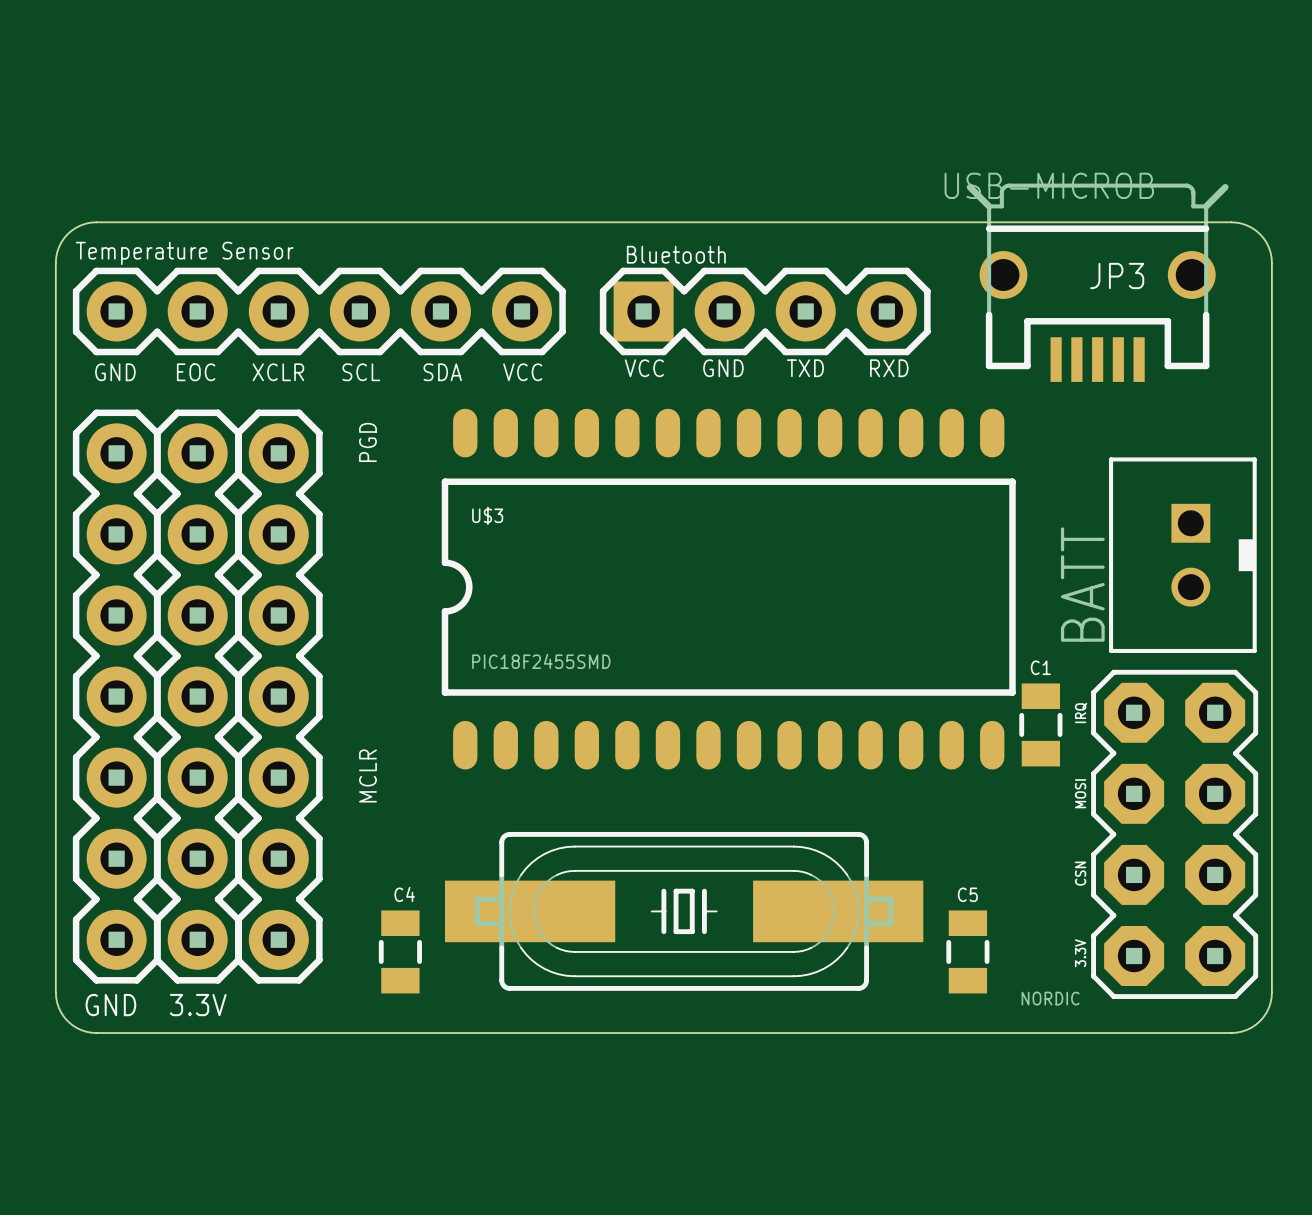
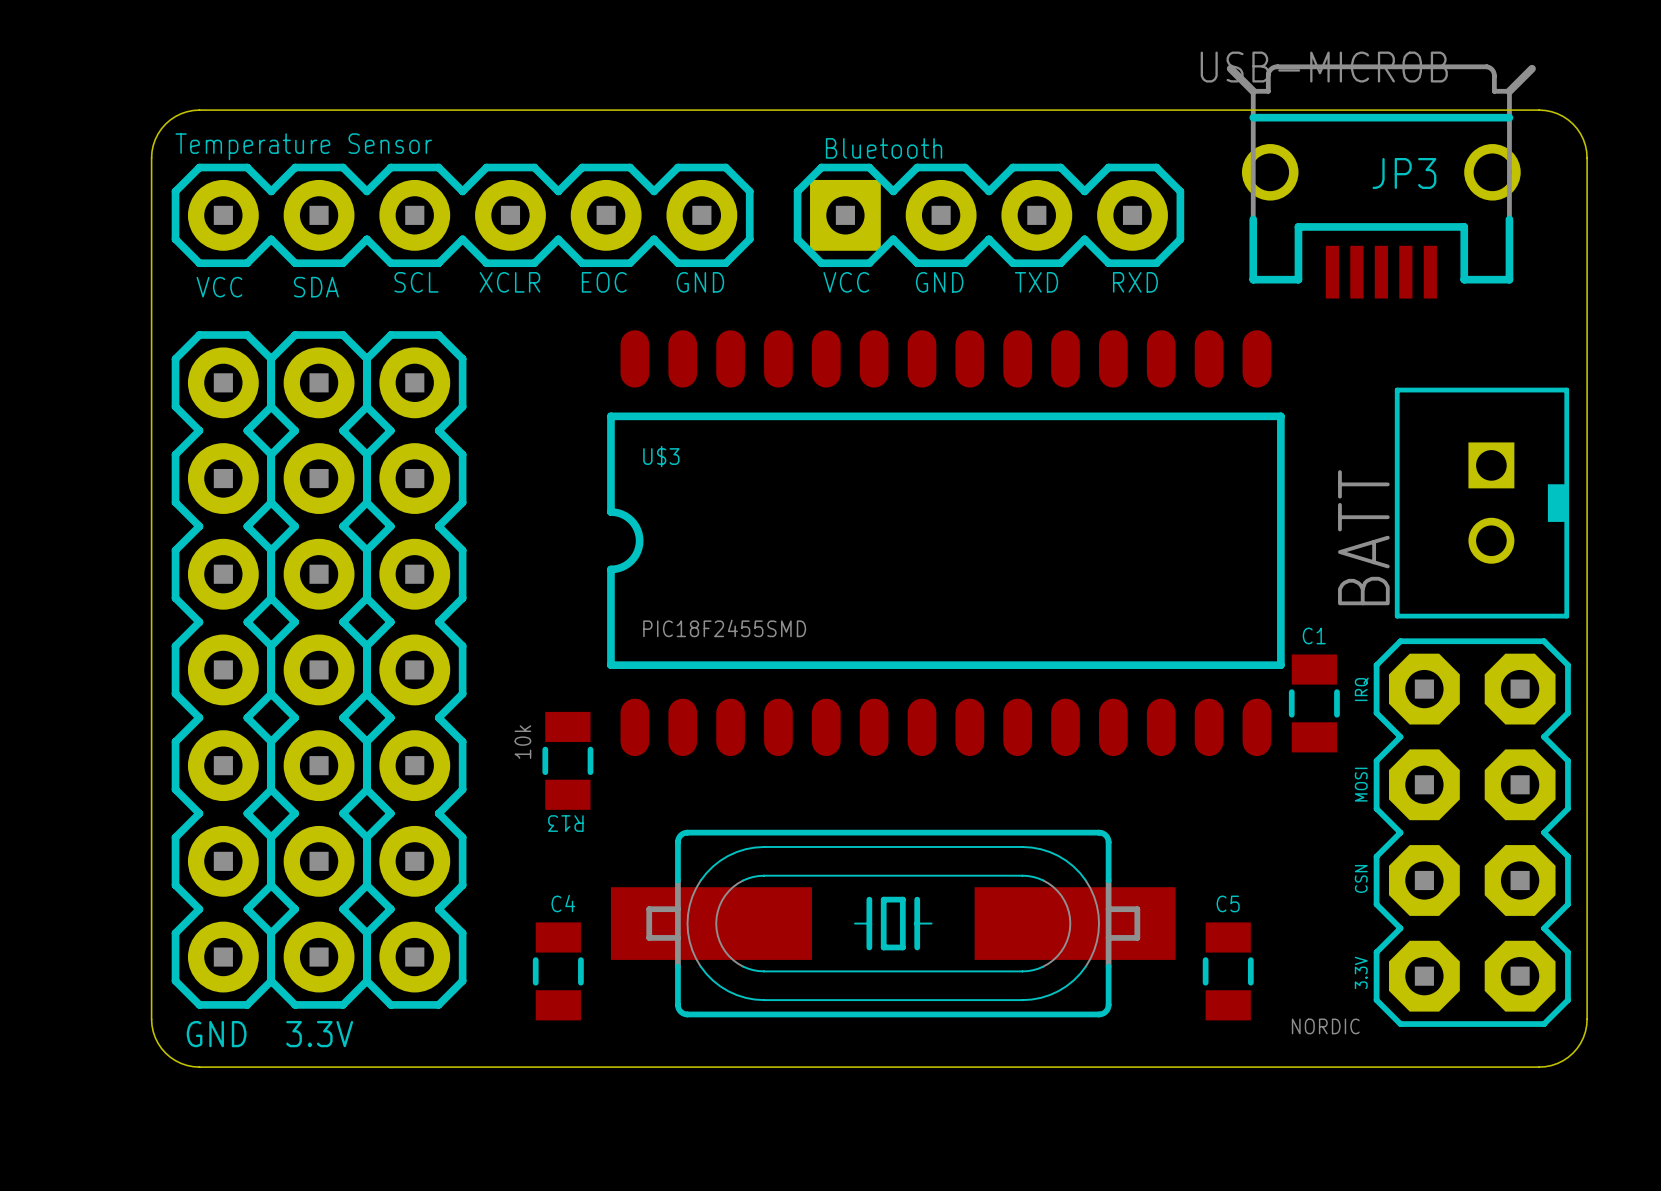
text: GND (115, 372) -> VCC (219, 287)
text: EOC (196, 372) -> SDA (316, 287)
text: XCLR (278, 372) -> SCL (416, 282)
text: SCL (361, 372) -> XCLR (509, 282)
text: SDA (442, 372) -> EOC (604, 282)
text: VCC (522, 372) -> GND (700, 282)
text: PGD (367, 442) -> none
R13: none -> 10k (567, 760)
text: MCLR (367, 775) -> none

